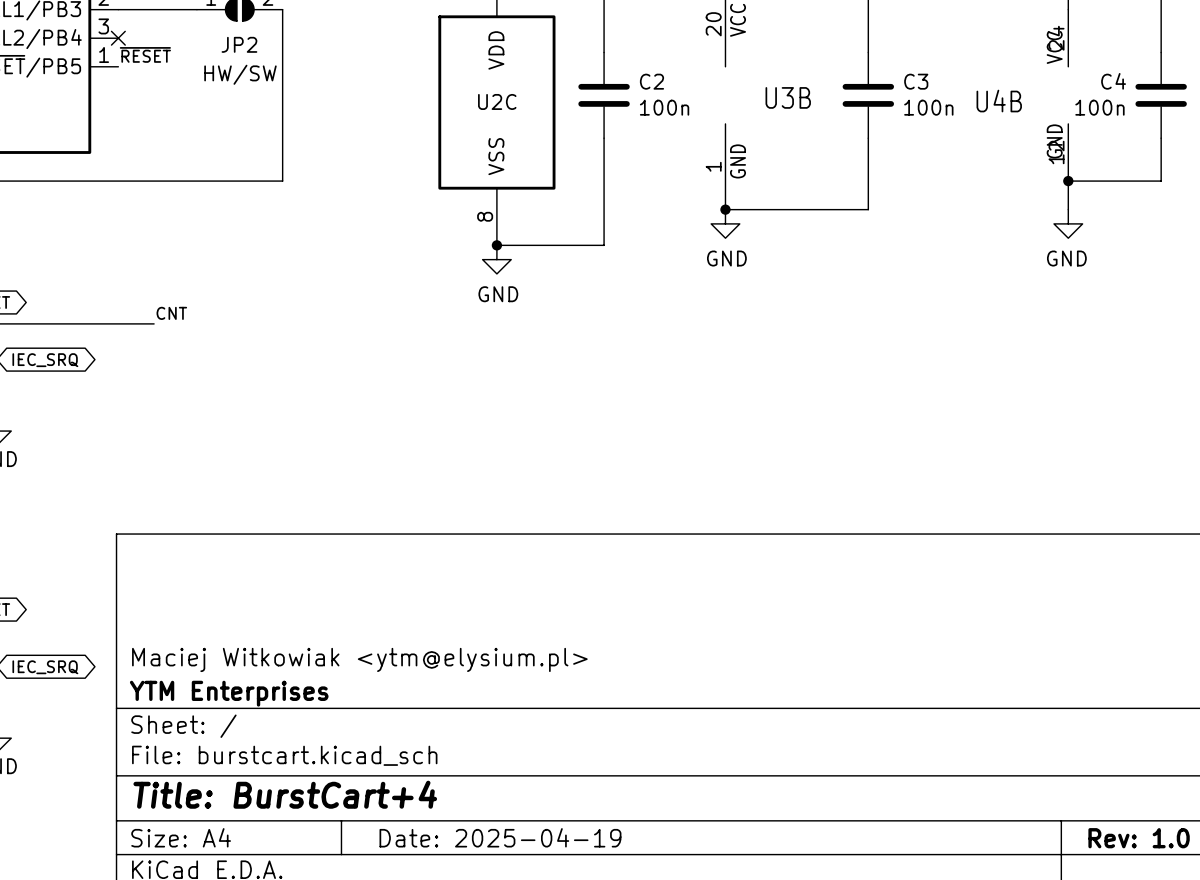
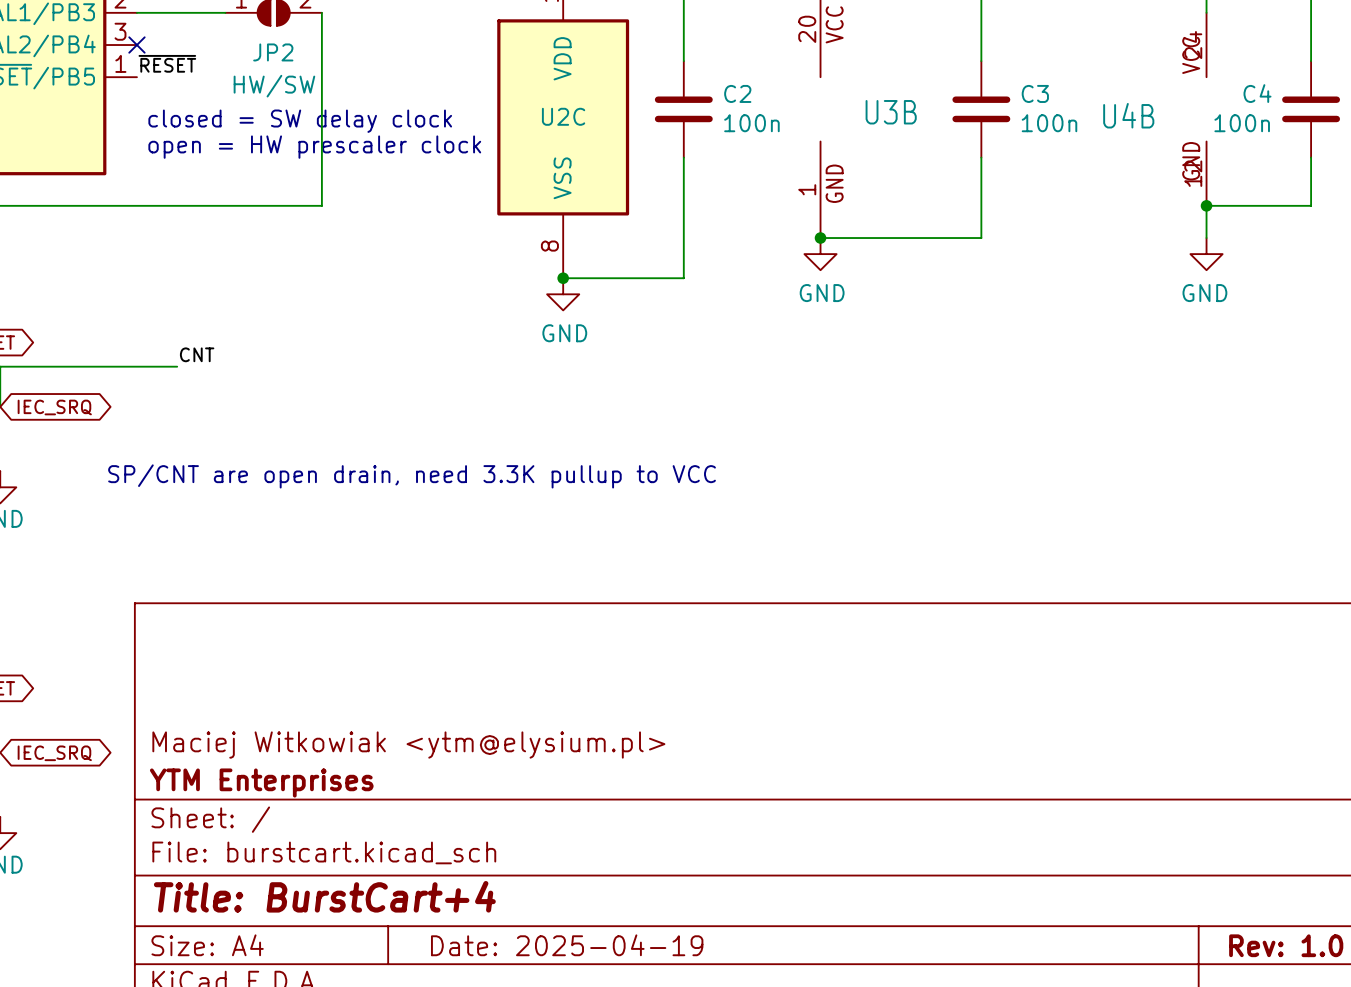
text: none -> closed = SW delay clock (300, 121)
text: none -> open = HW prescaler clock (314, 147)
text: none -> SP/CNT are open drain, need 3.3K pullup to VCC (412, 476)

